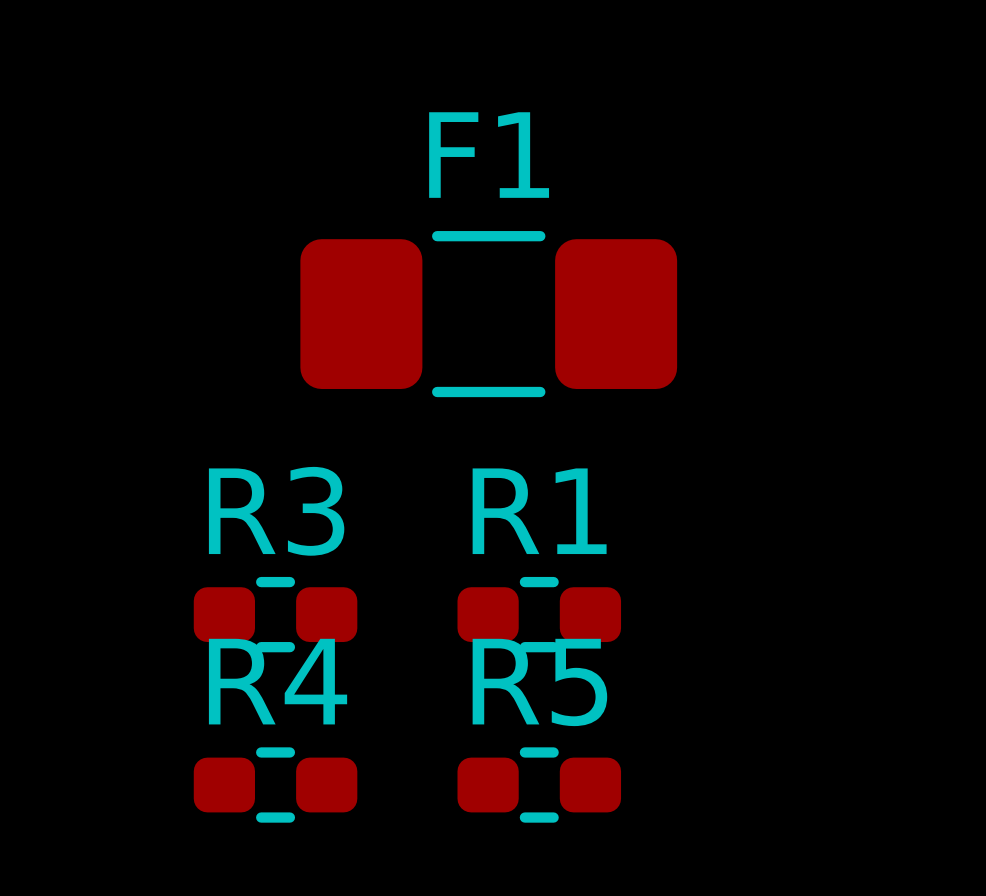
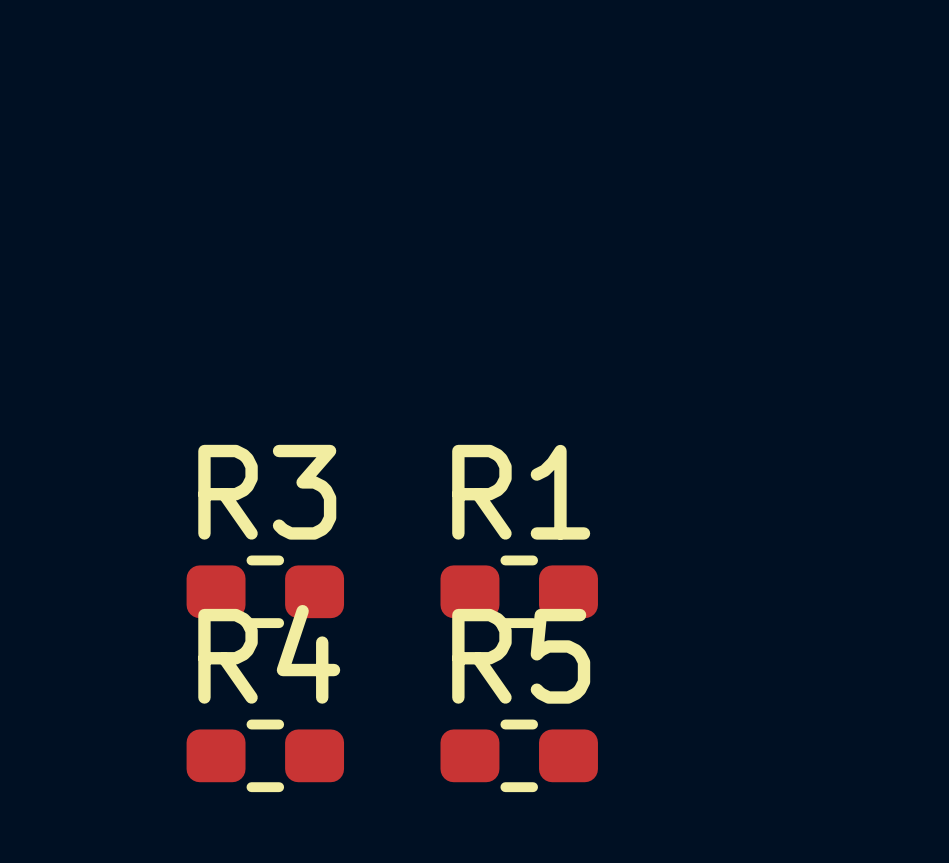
F1: (488, 314) -> none

